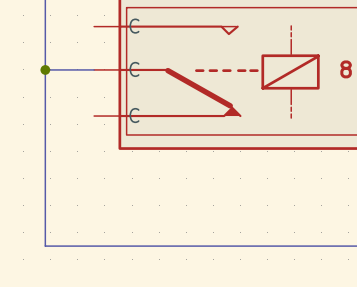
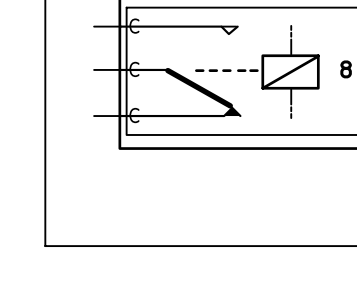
bus: (45, 69) (94, 69) -> none
junction: (45, 69) -> none

